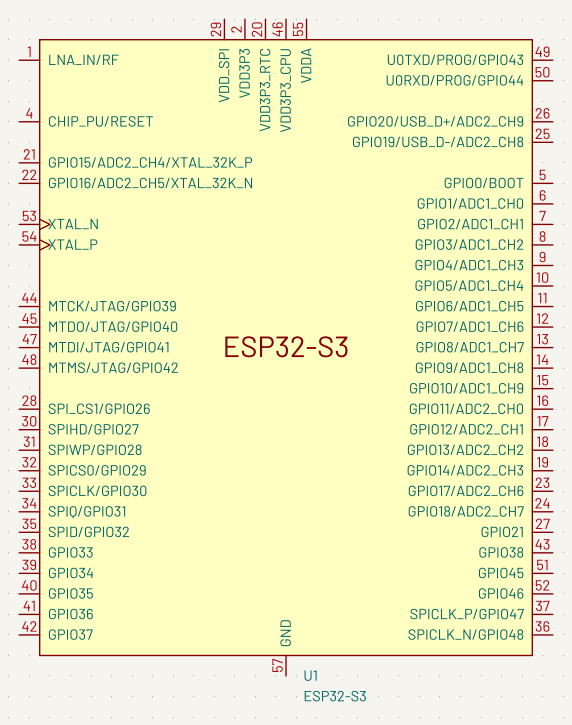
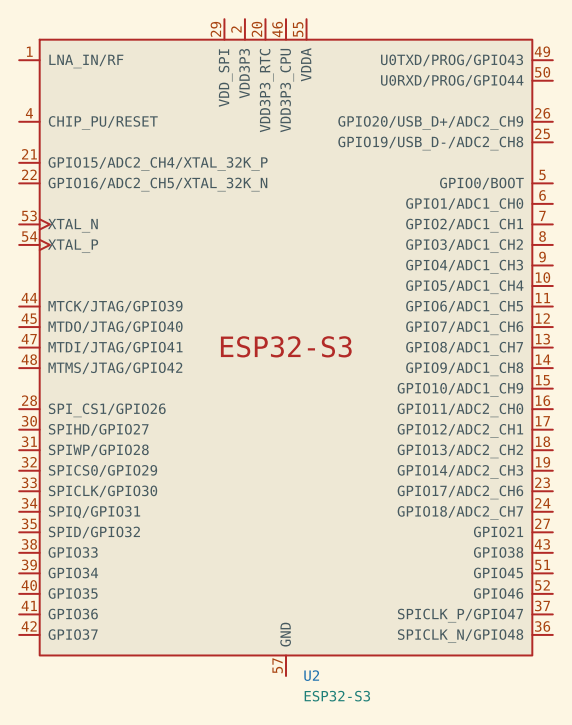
U1 name: U1 (310, 675) -> U2 (311, 675)

